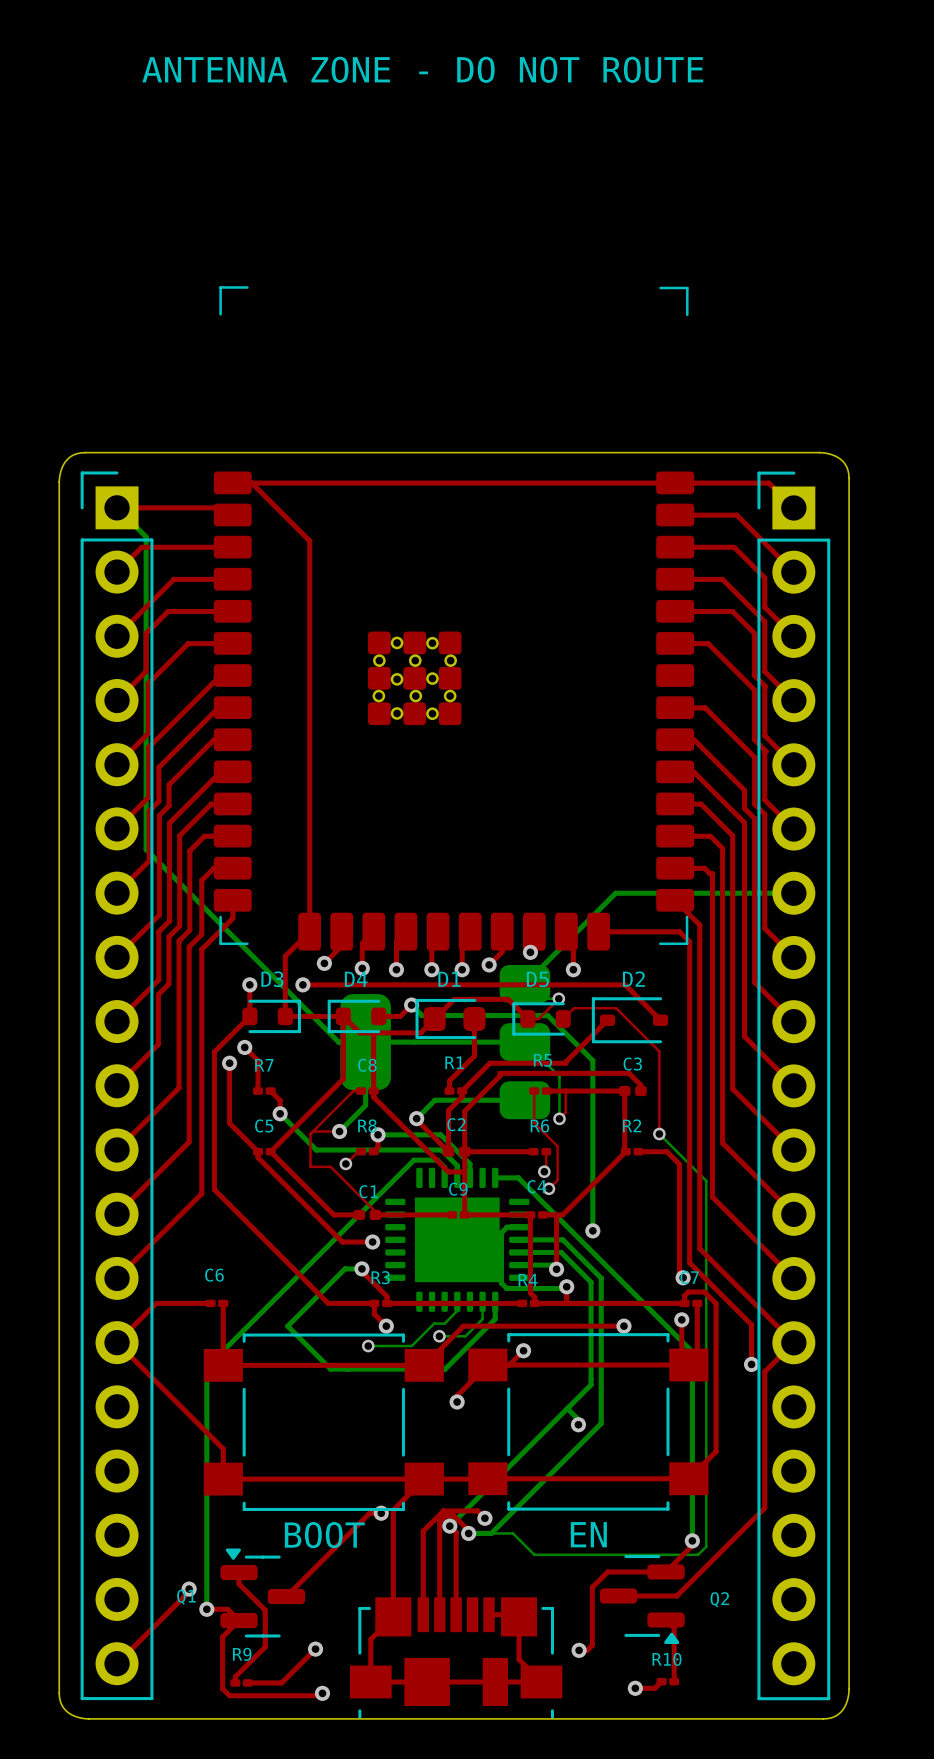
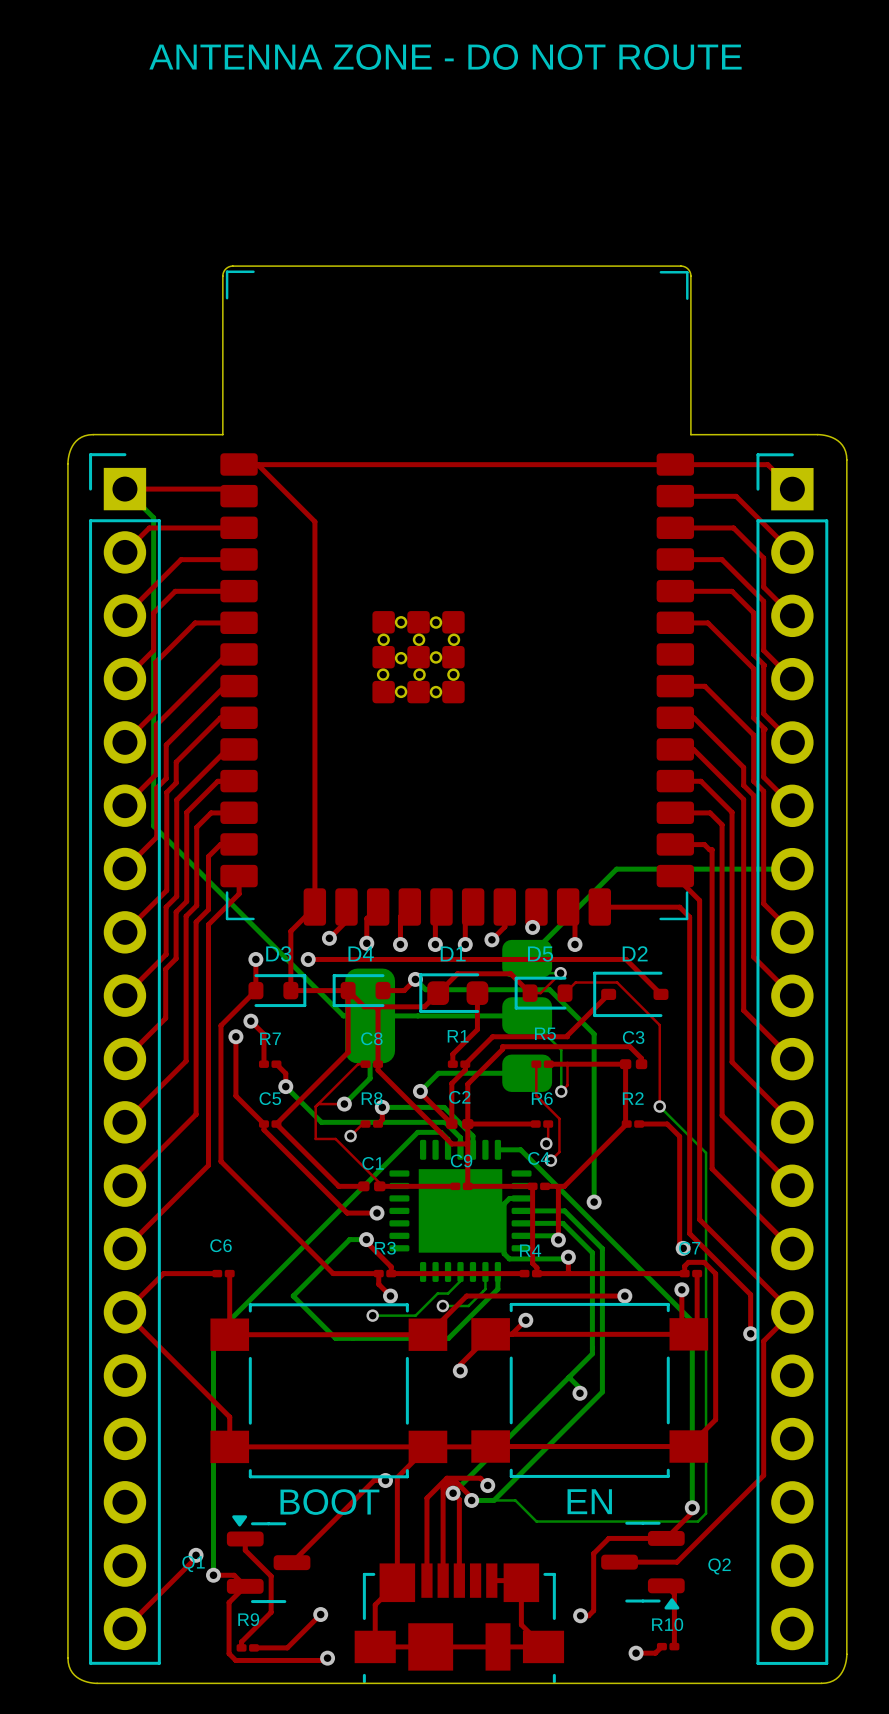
board edge: (84, 452) (819, 452) -> (93, 434) (222, 434) (222, 274) (226, 268) (232, 266) (684, 266) (688, 269) (690, 276) (690, 434) (817, 434)

